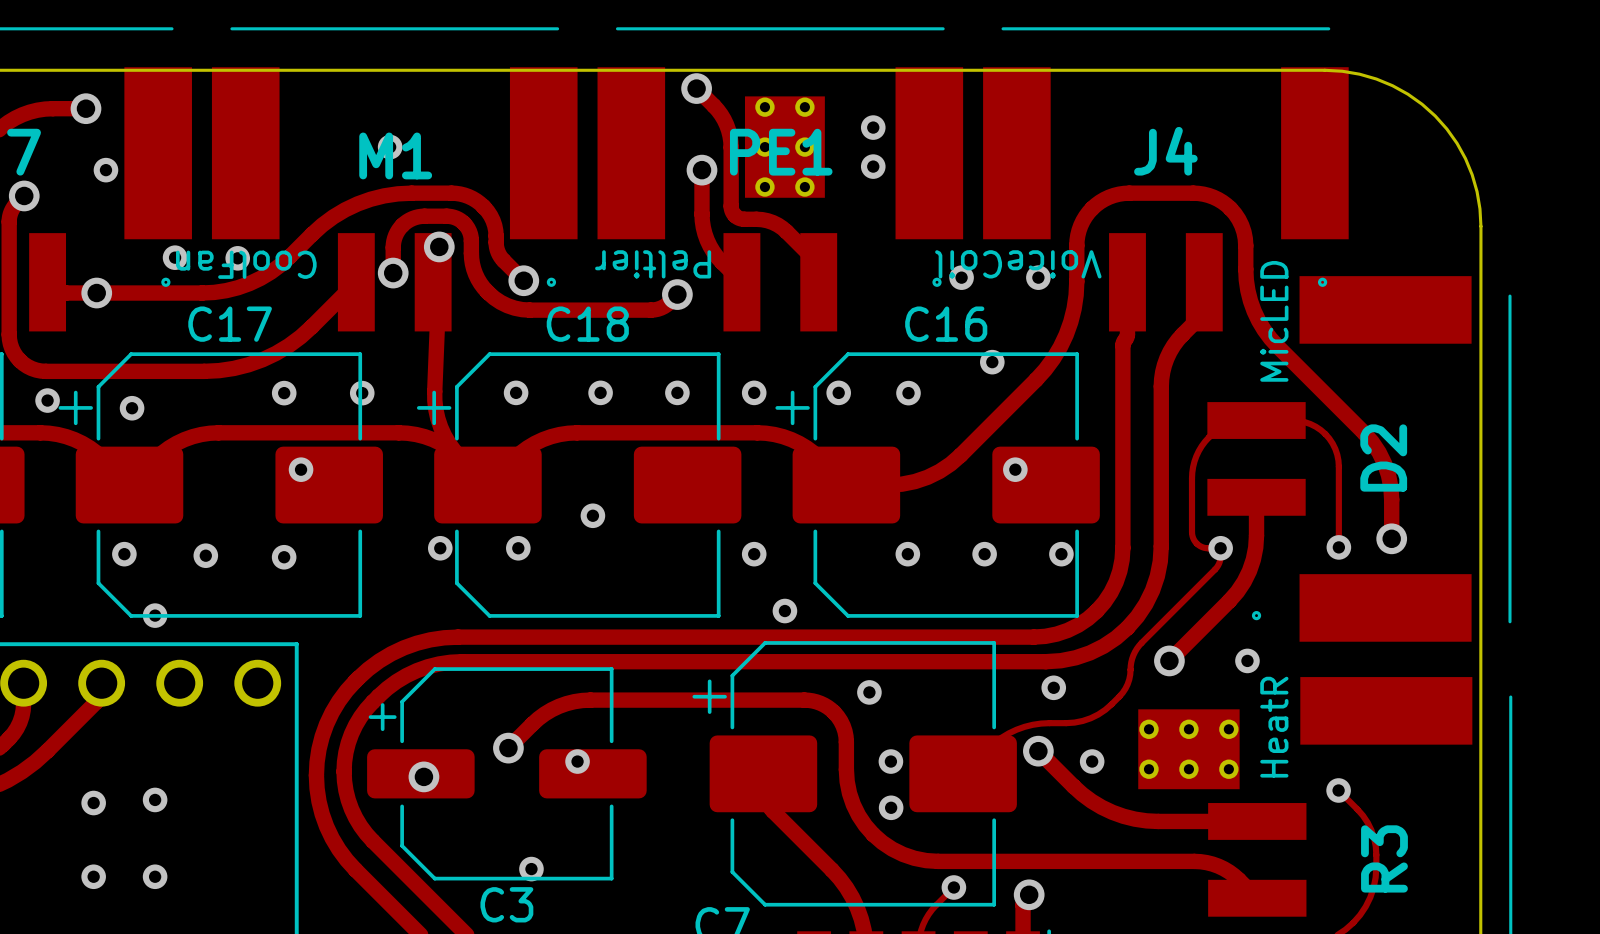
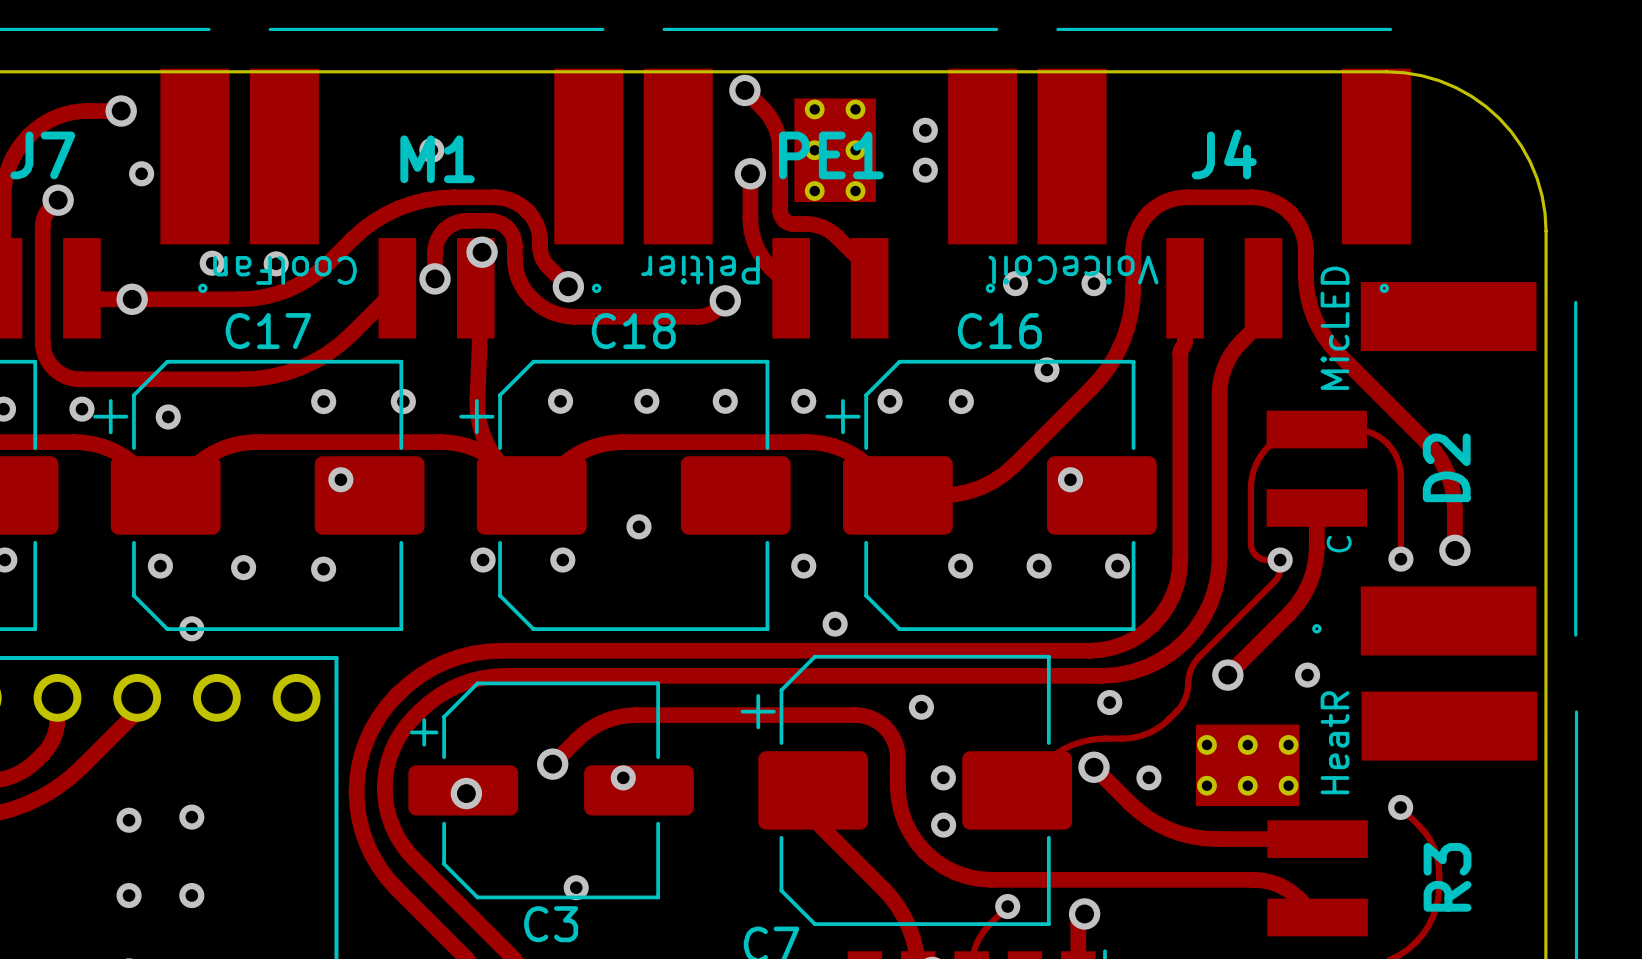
text: none -> C (1339, 544)

